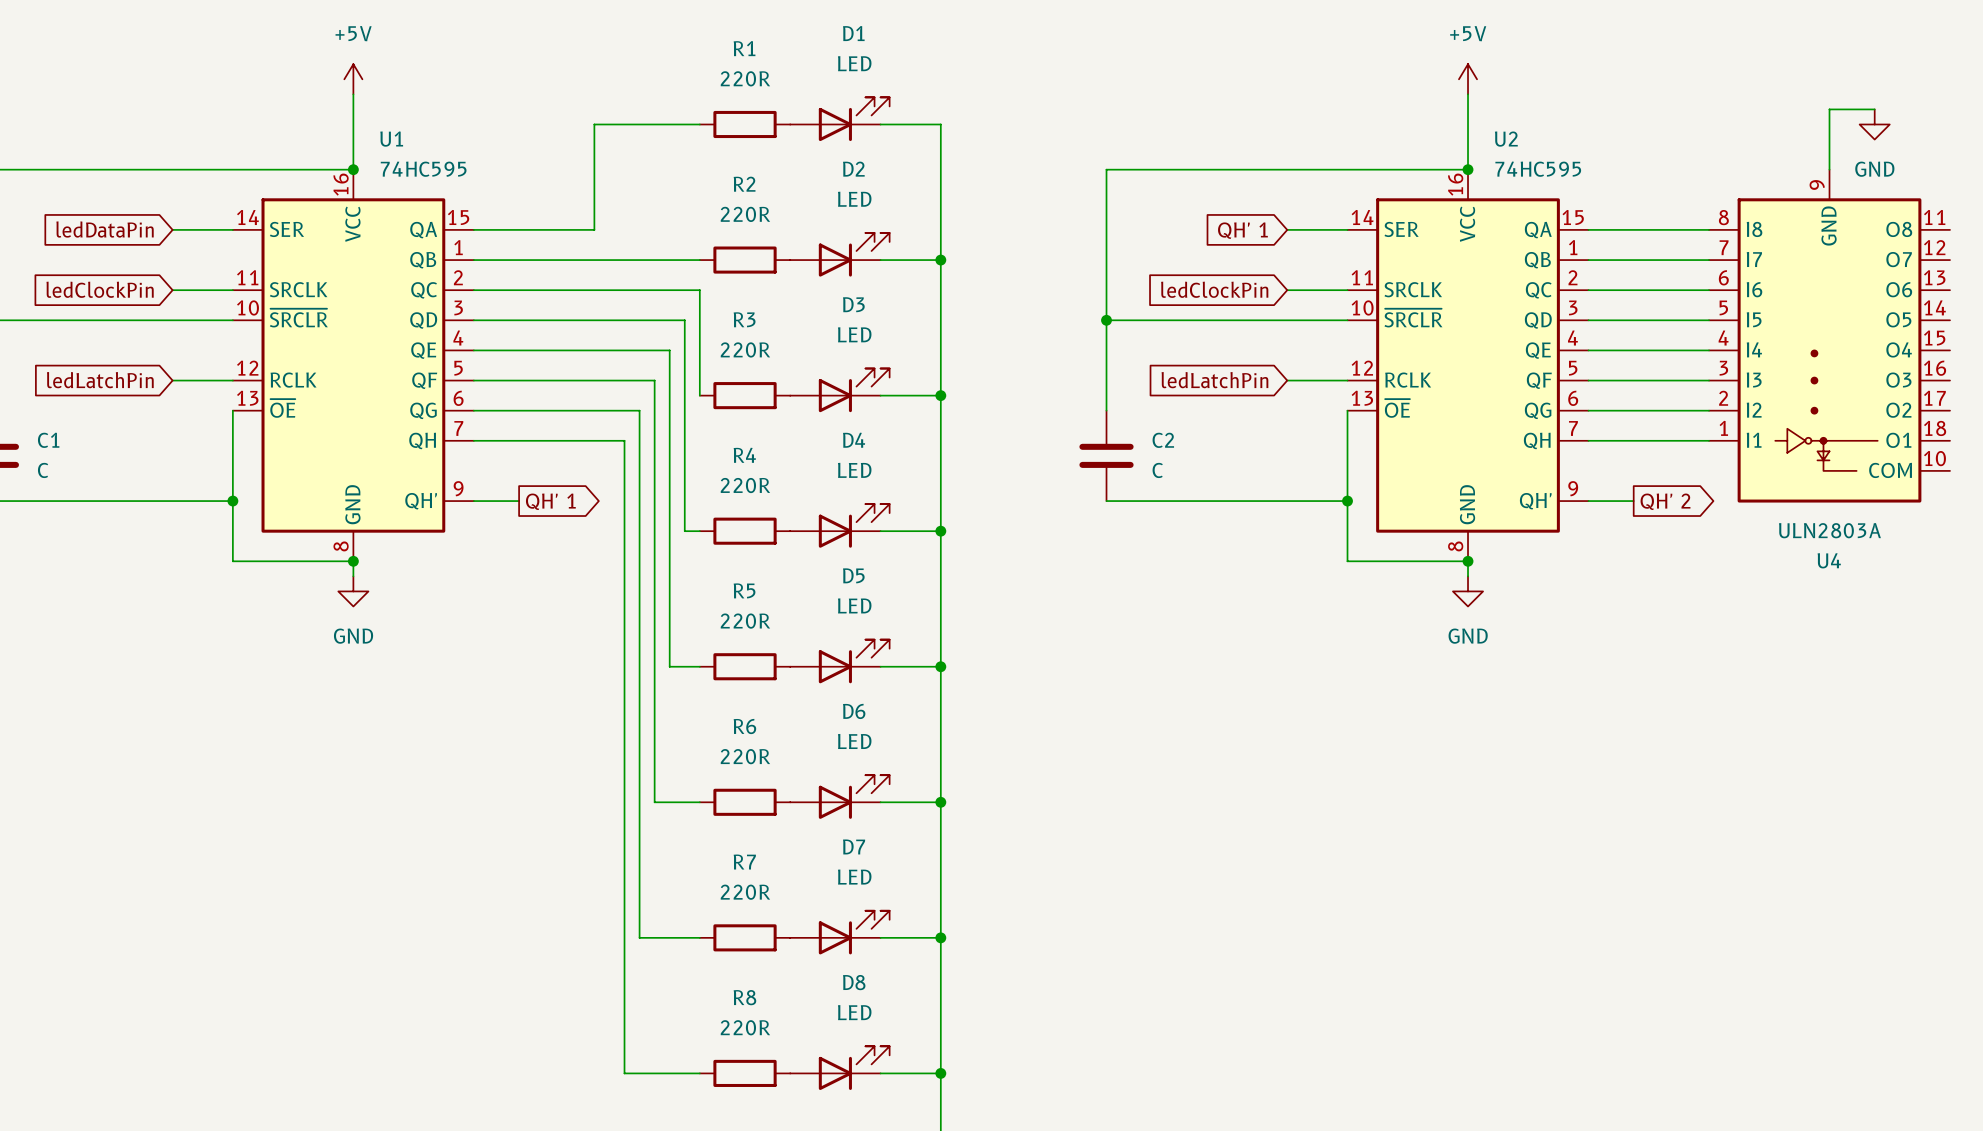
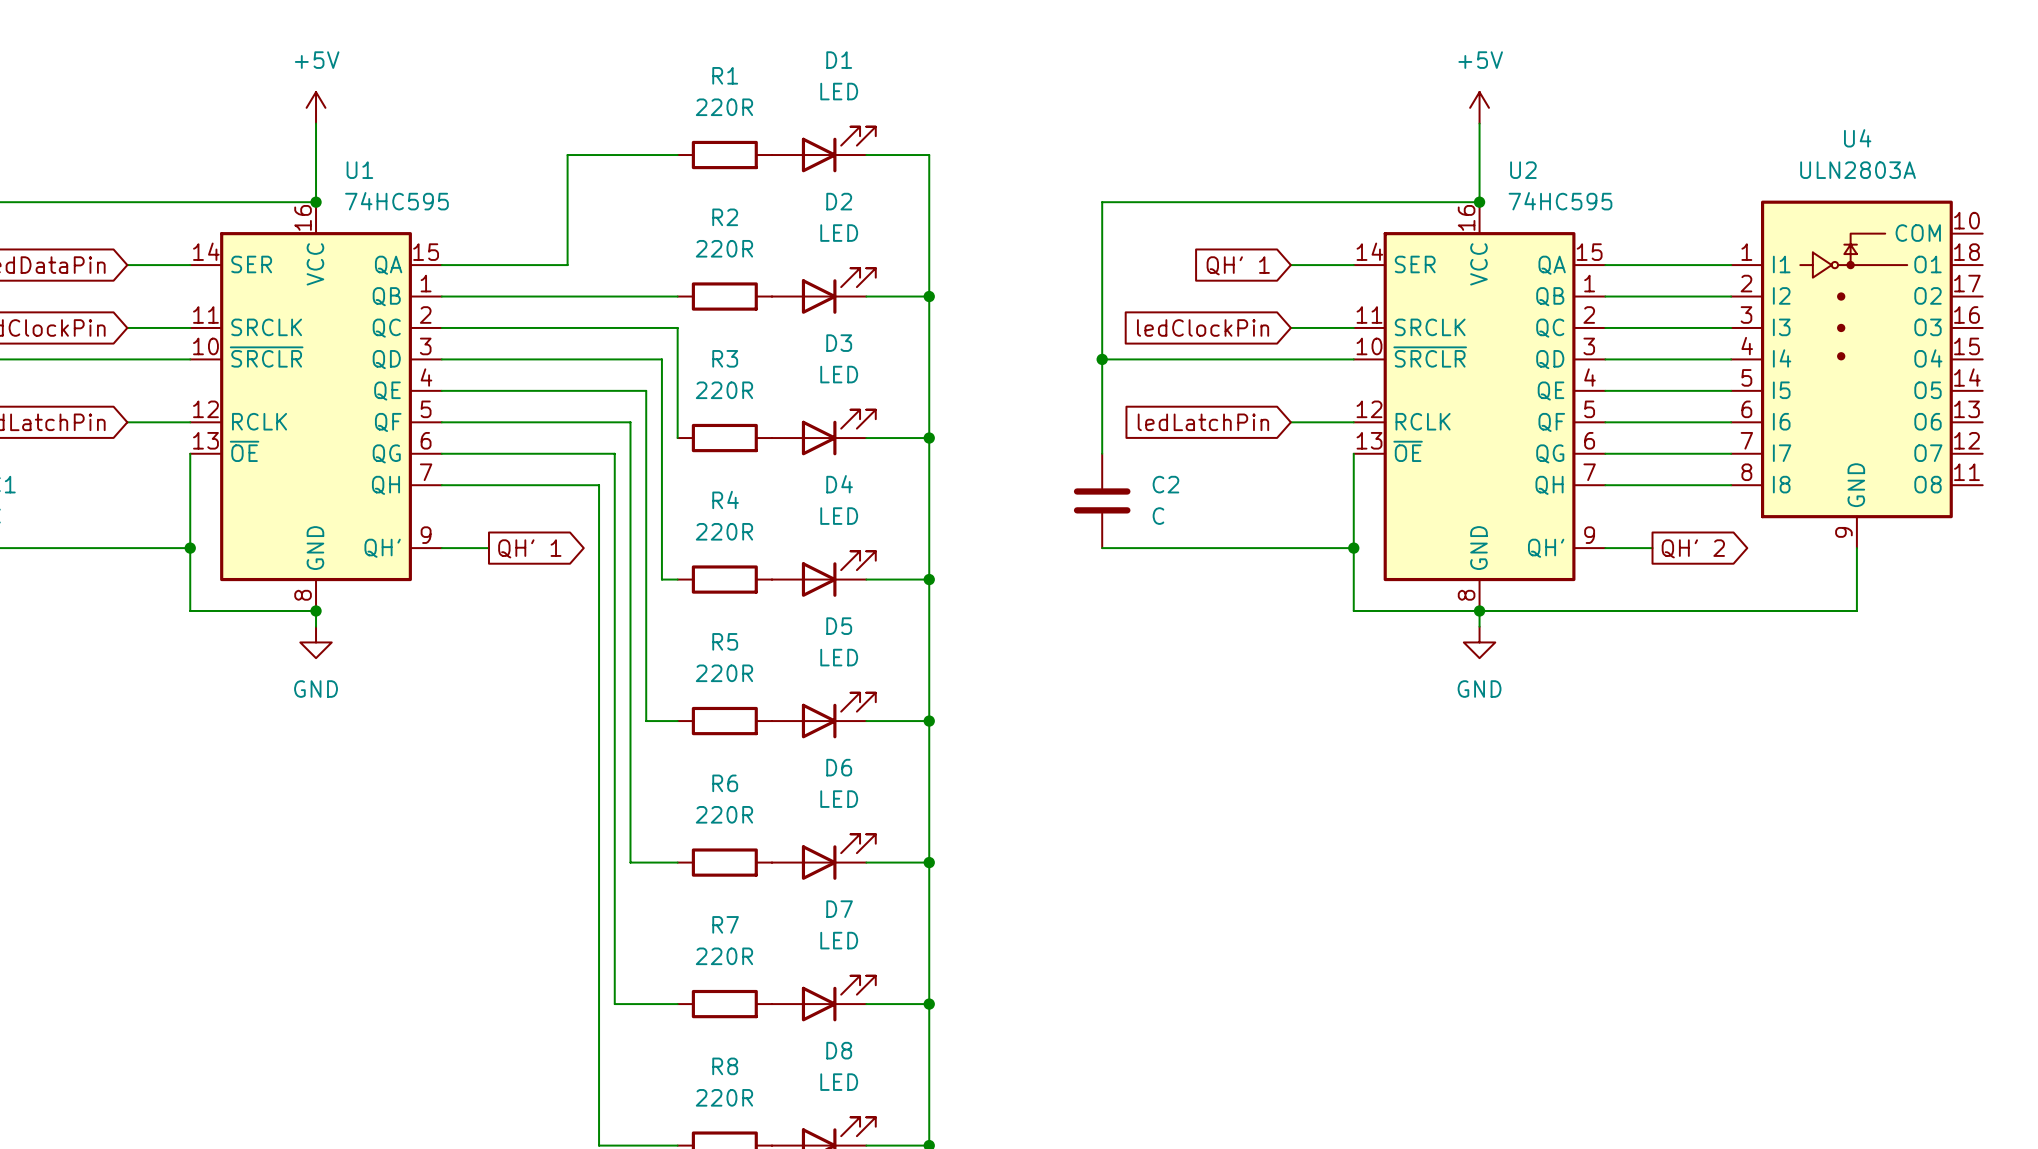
wire: (1874, 109) (1829, 109) (1829, 169) -> none
power symbol: GND (1874, 124) -> none
U4 flip: as is (1829, 350) -> up-down (1856, 359)
wire: none -> (1856, 548) (1856, 610) (1479, 610)

